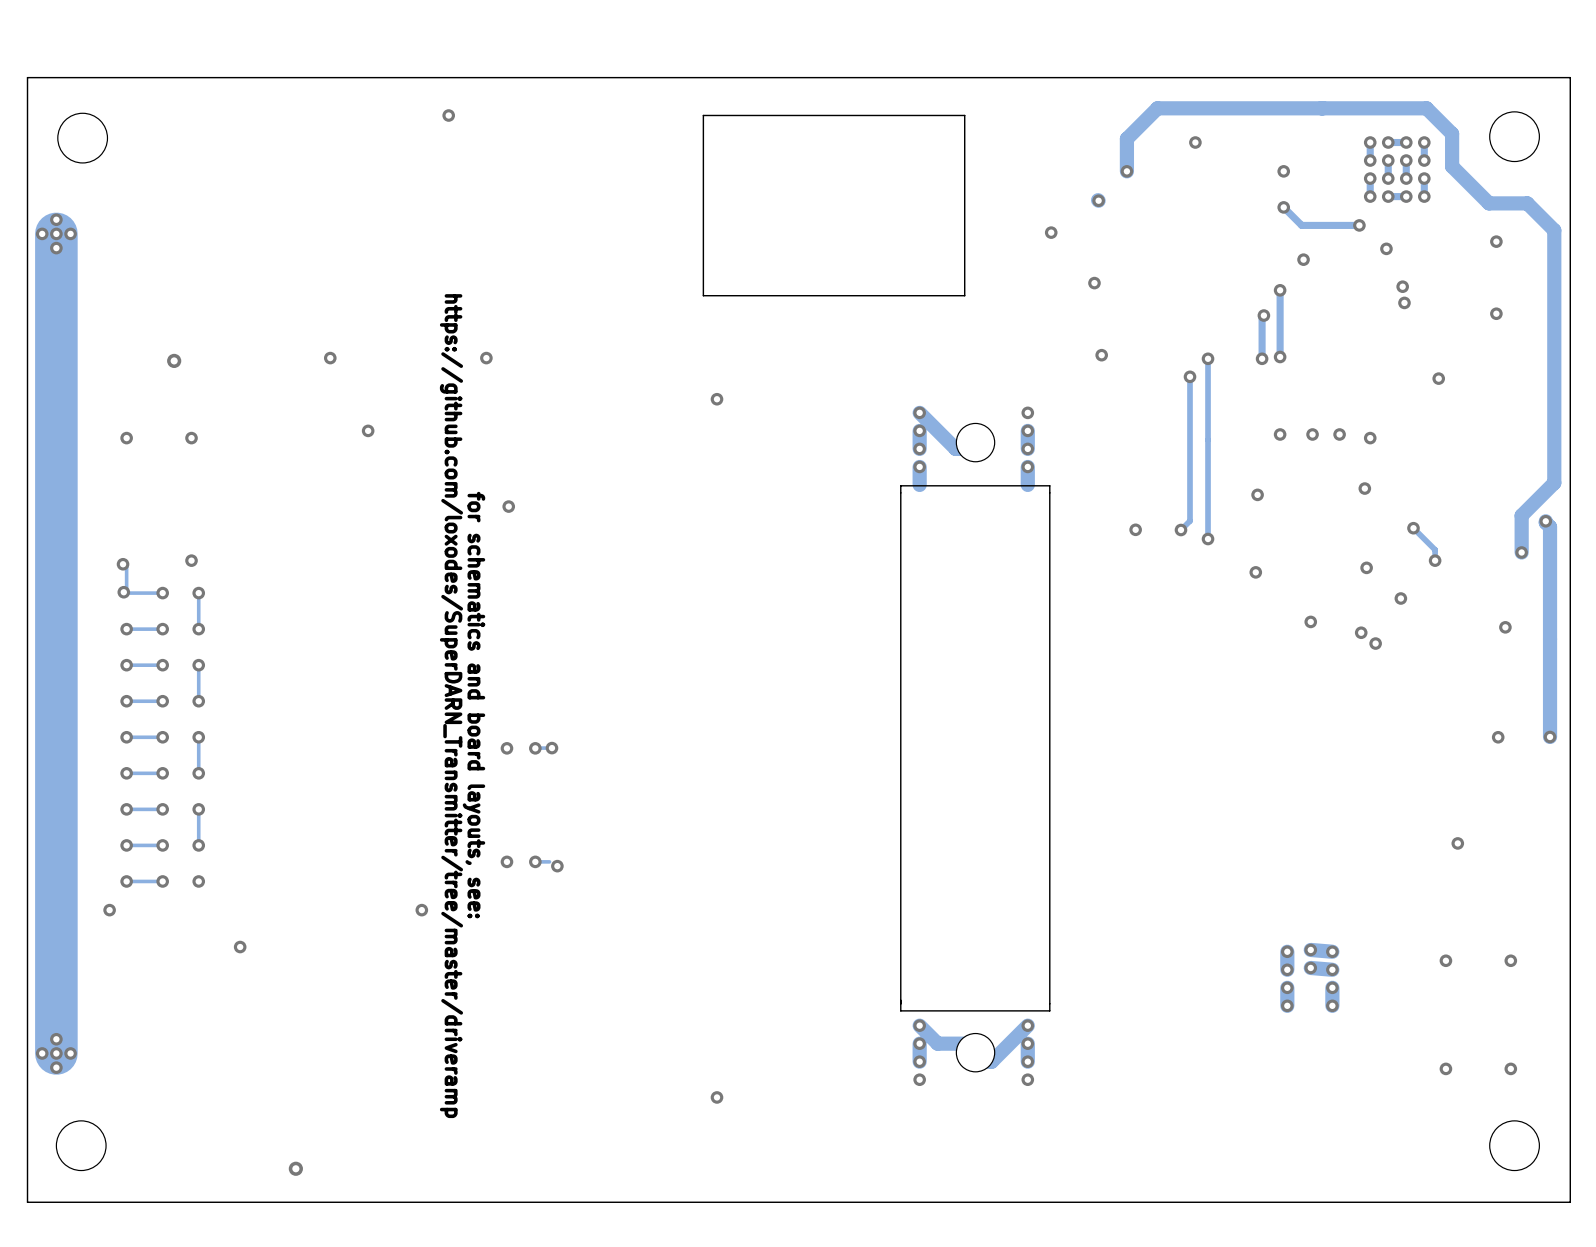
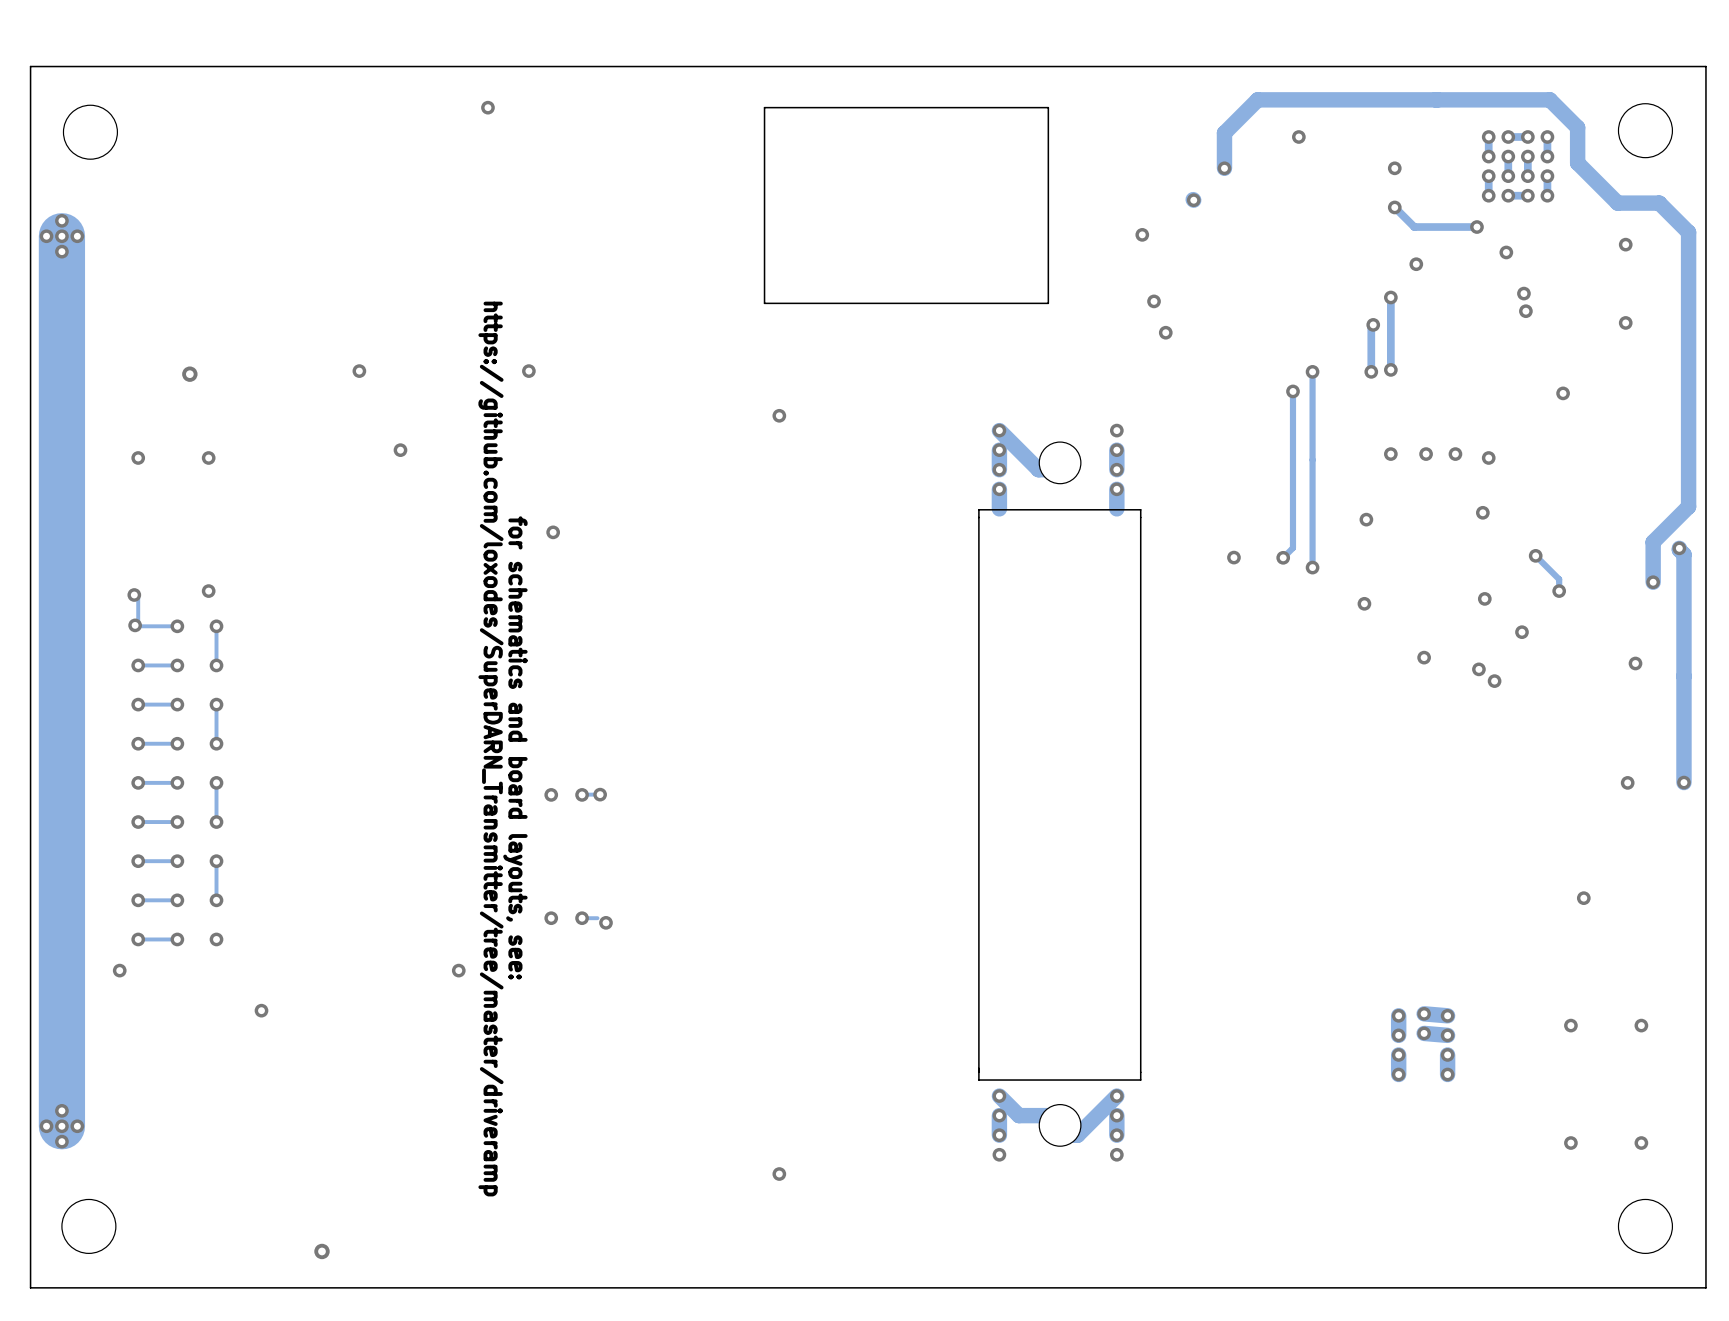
via: (1094, 283) -> none
via: none -> (1154, 301)
via: none -> (1165, 332)
via: (1101, 355) -> none

